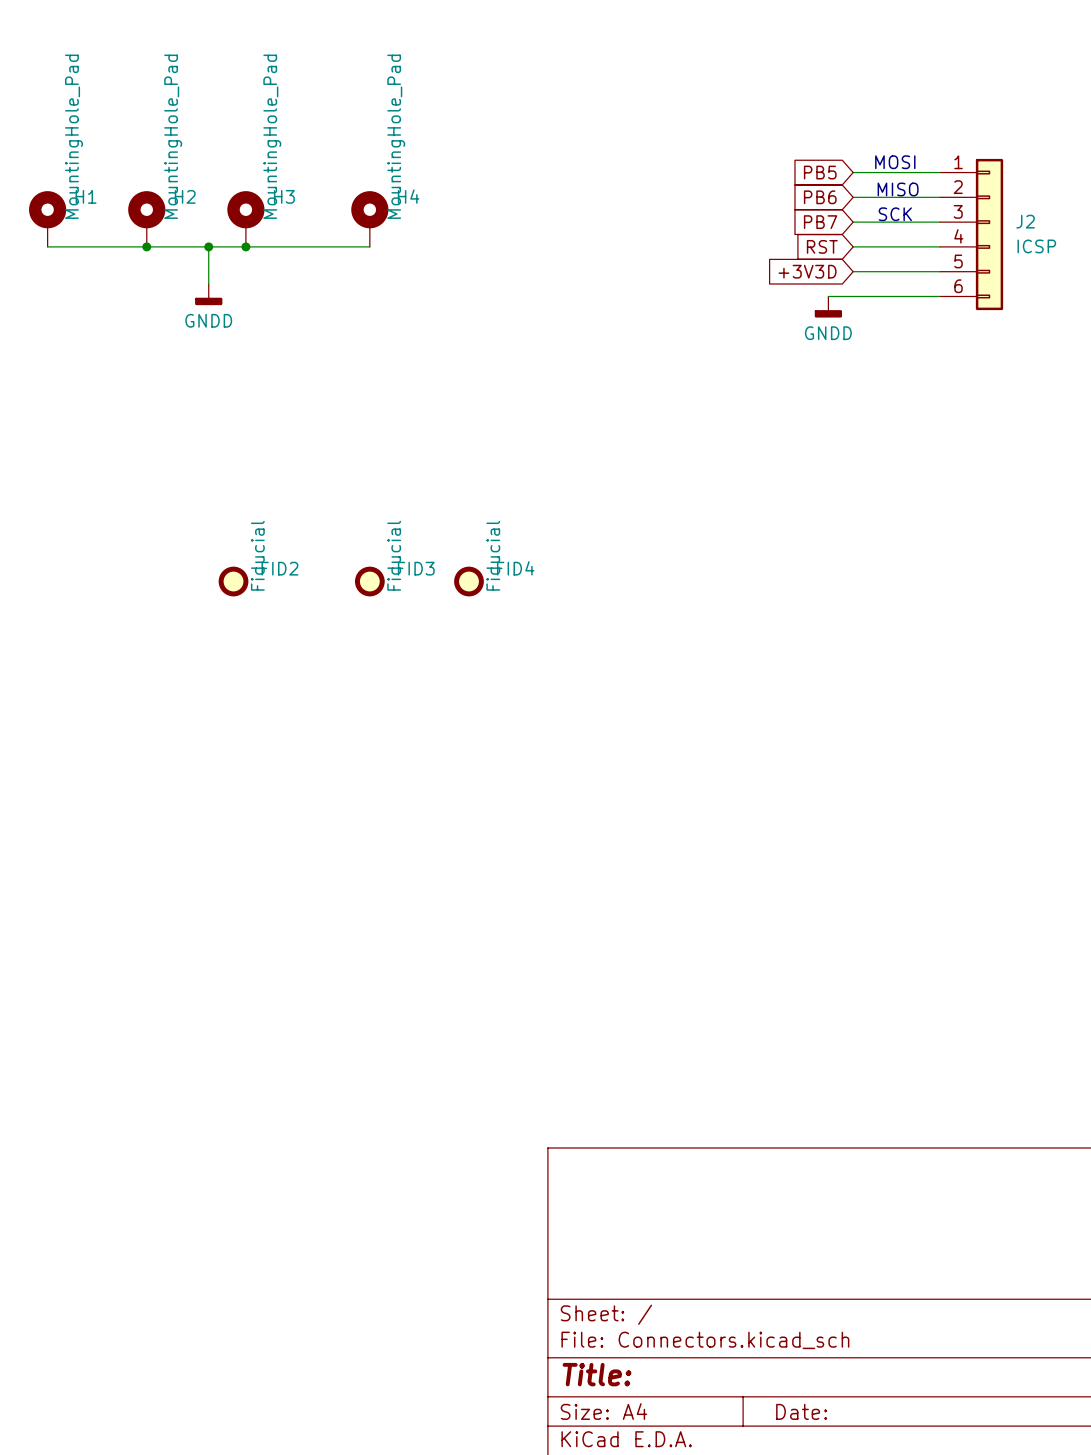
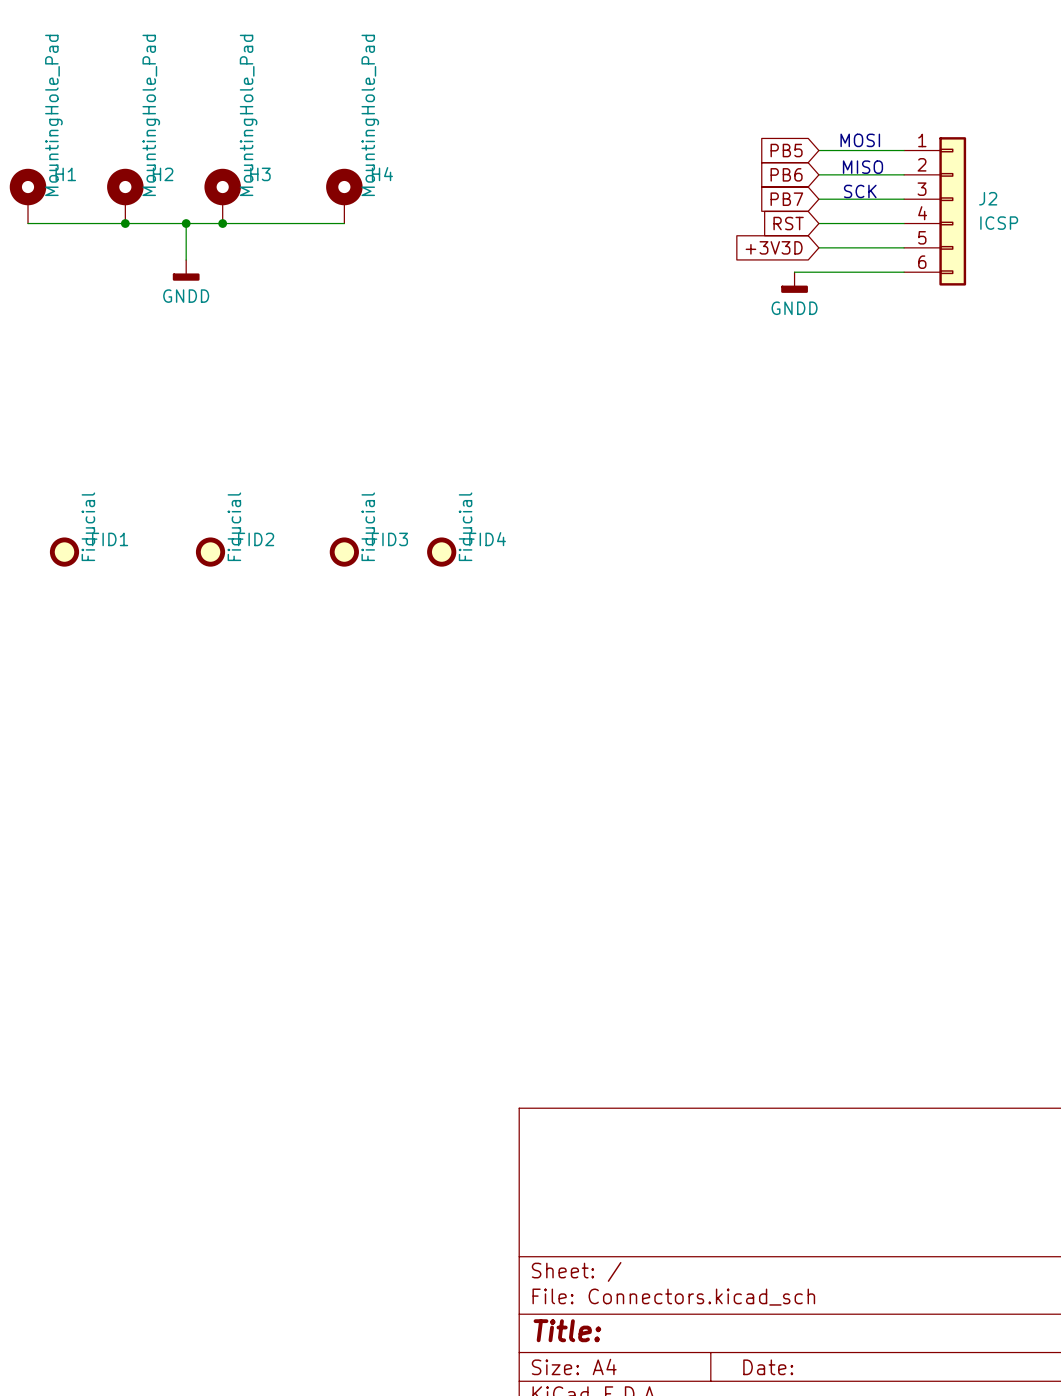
FID1: none -> Fiducial (64, 552)

